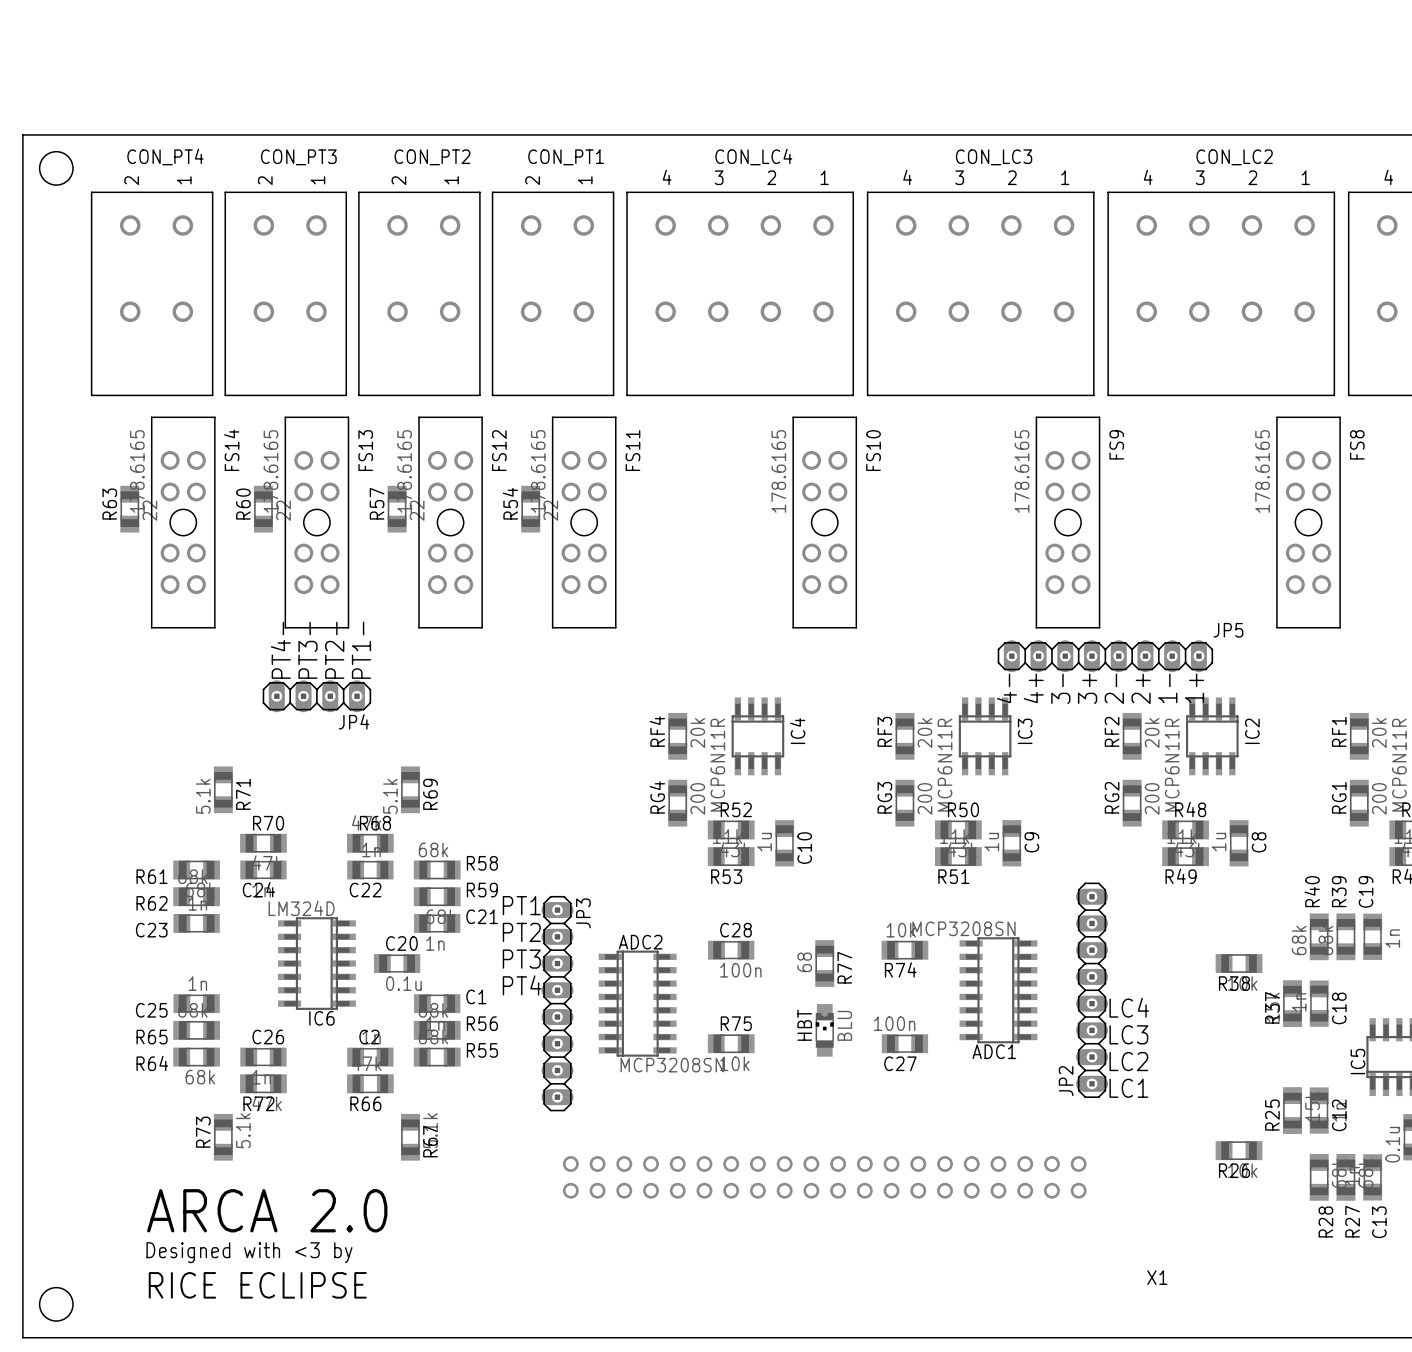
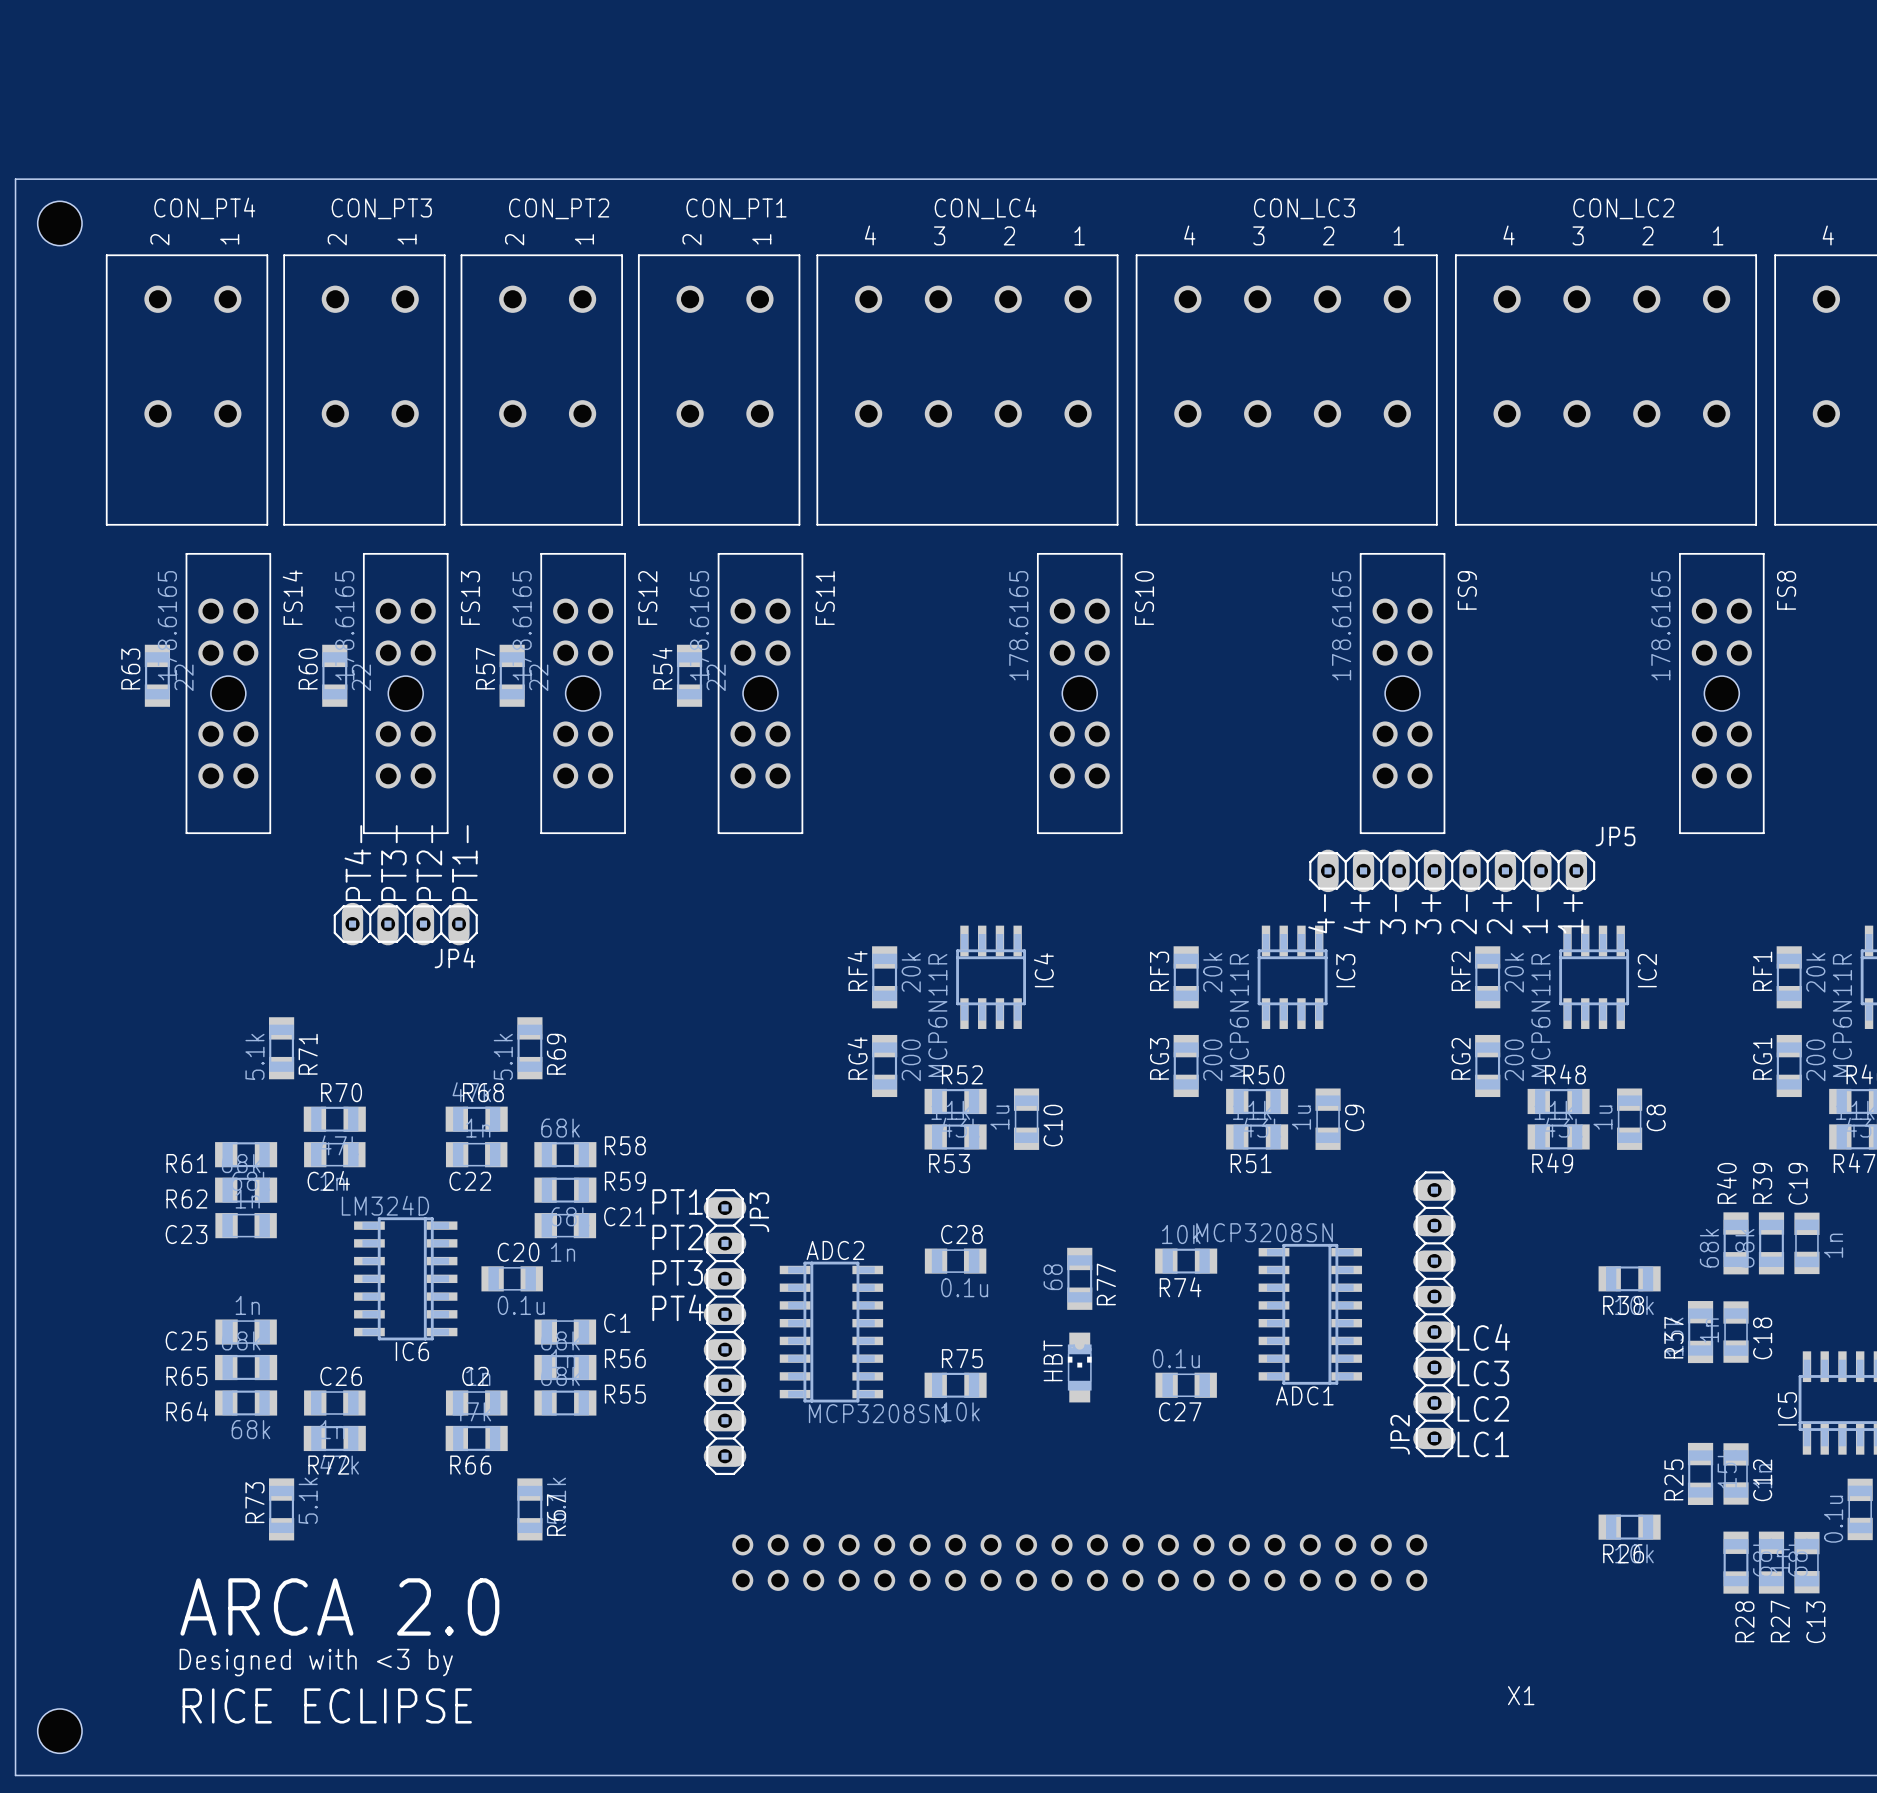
C28 value: 100n (740, 970) -> 0.1u (964, 1287)
C27 value: 100n (894, 1023) -> 0.1u (1176, 1358)
HBT value: BLU (844, 1025) -> none

